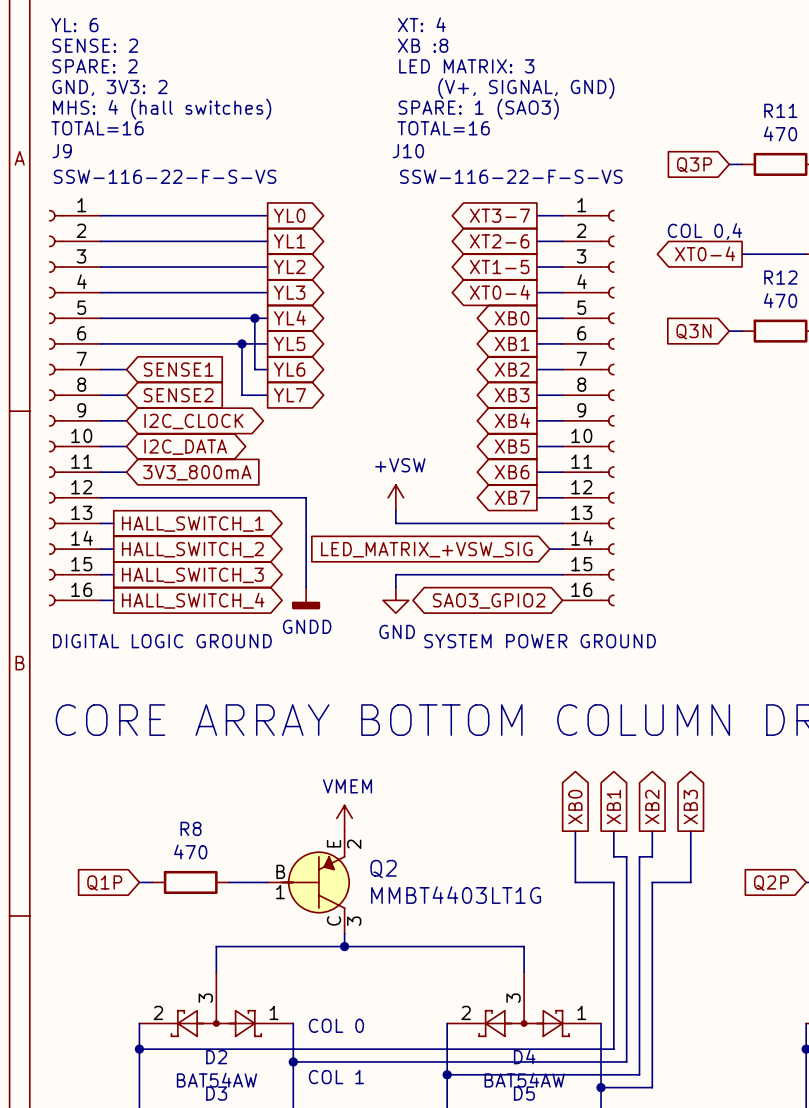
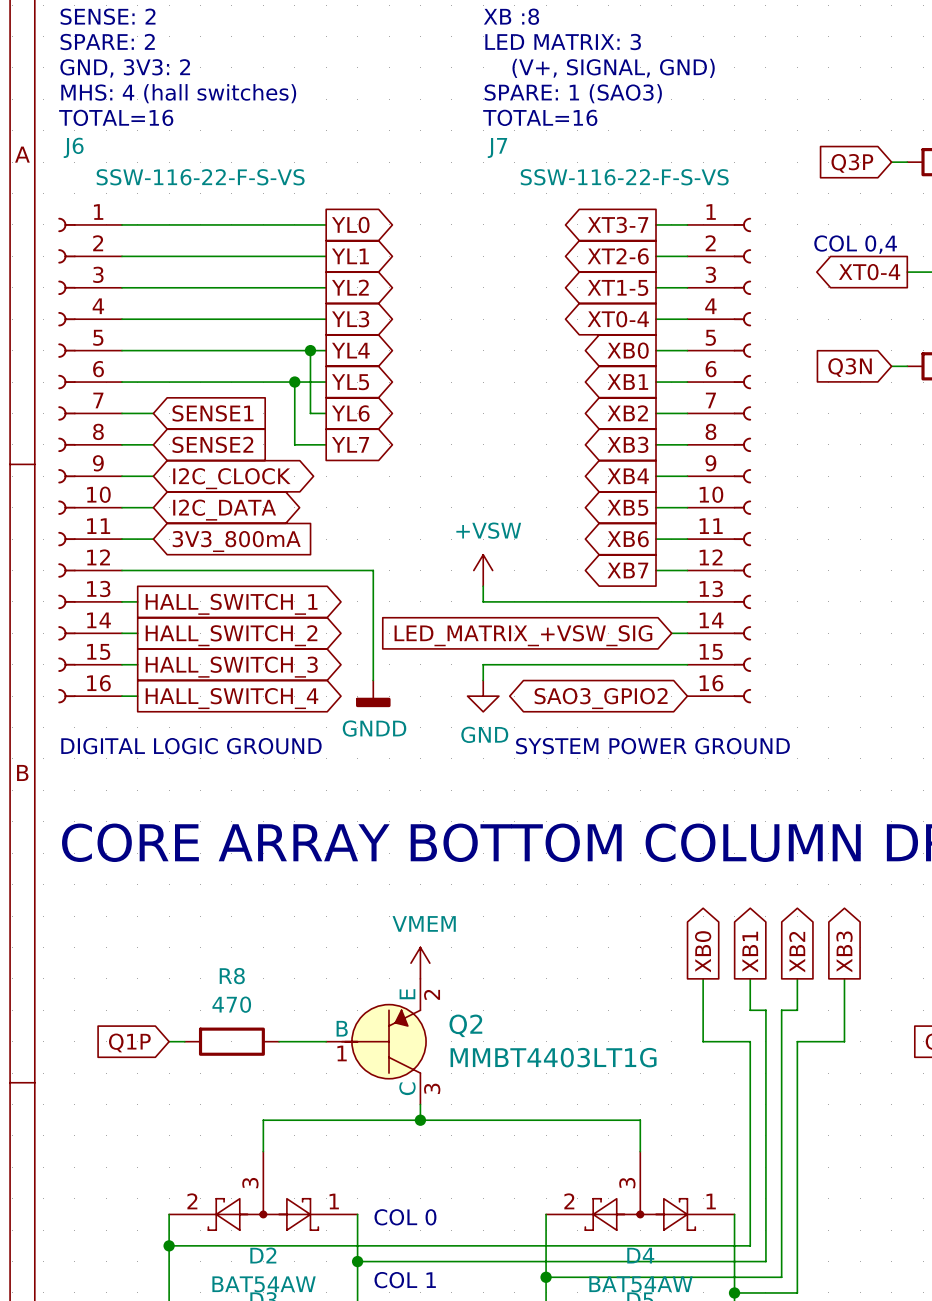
J9 name: J9 (62, 151) -> J6 (73, 147)
J10 name: J10 (408, 151) -> J7 (497, 148)

